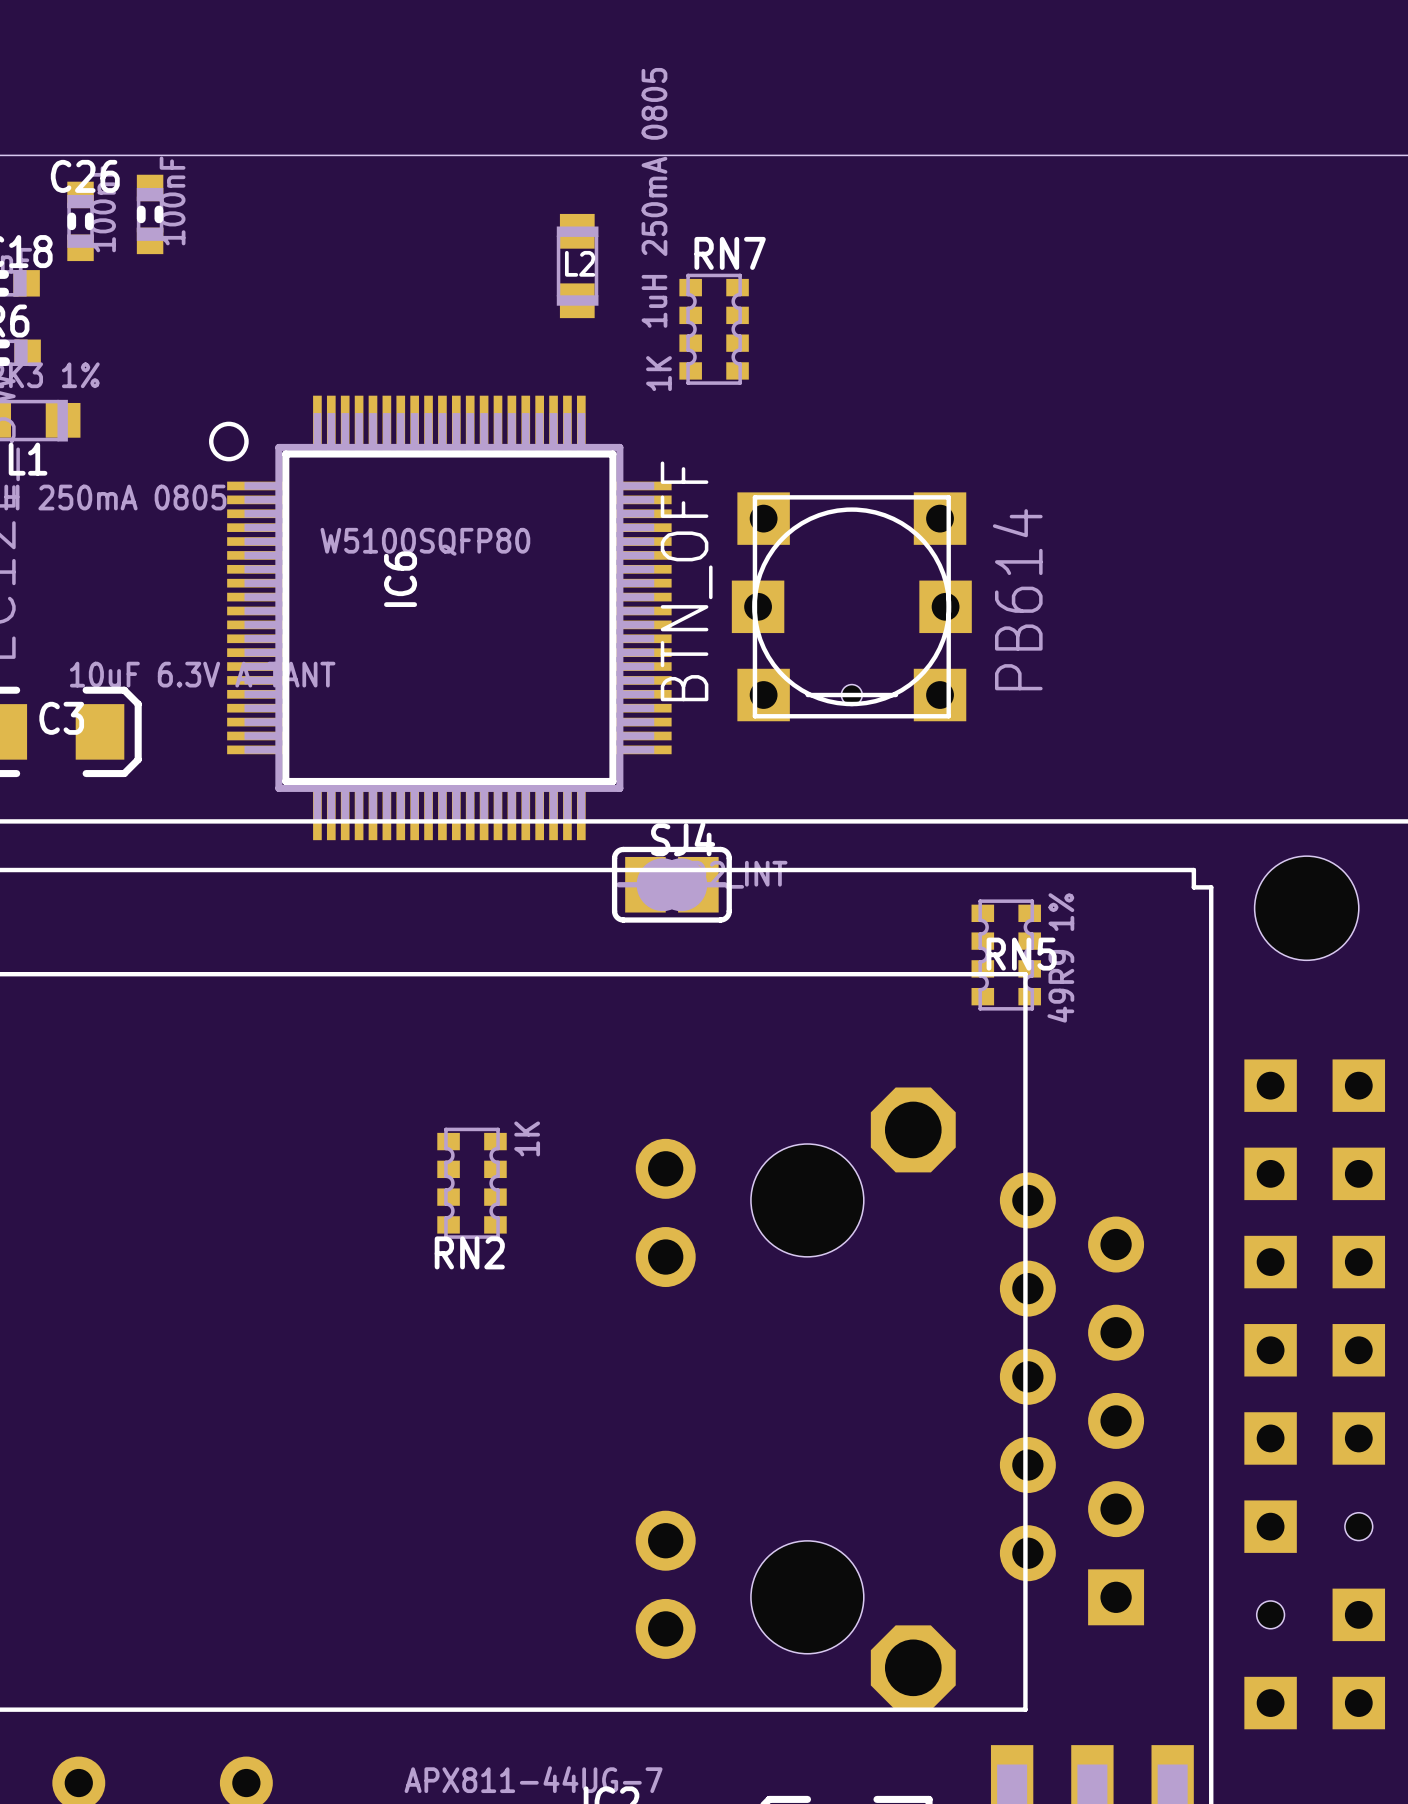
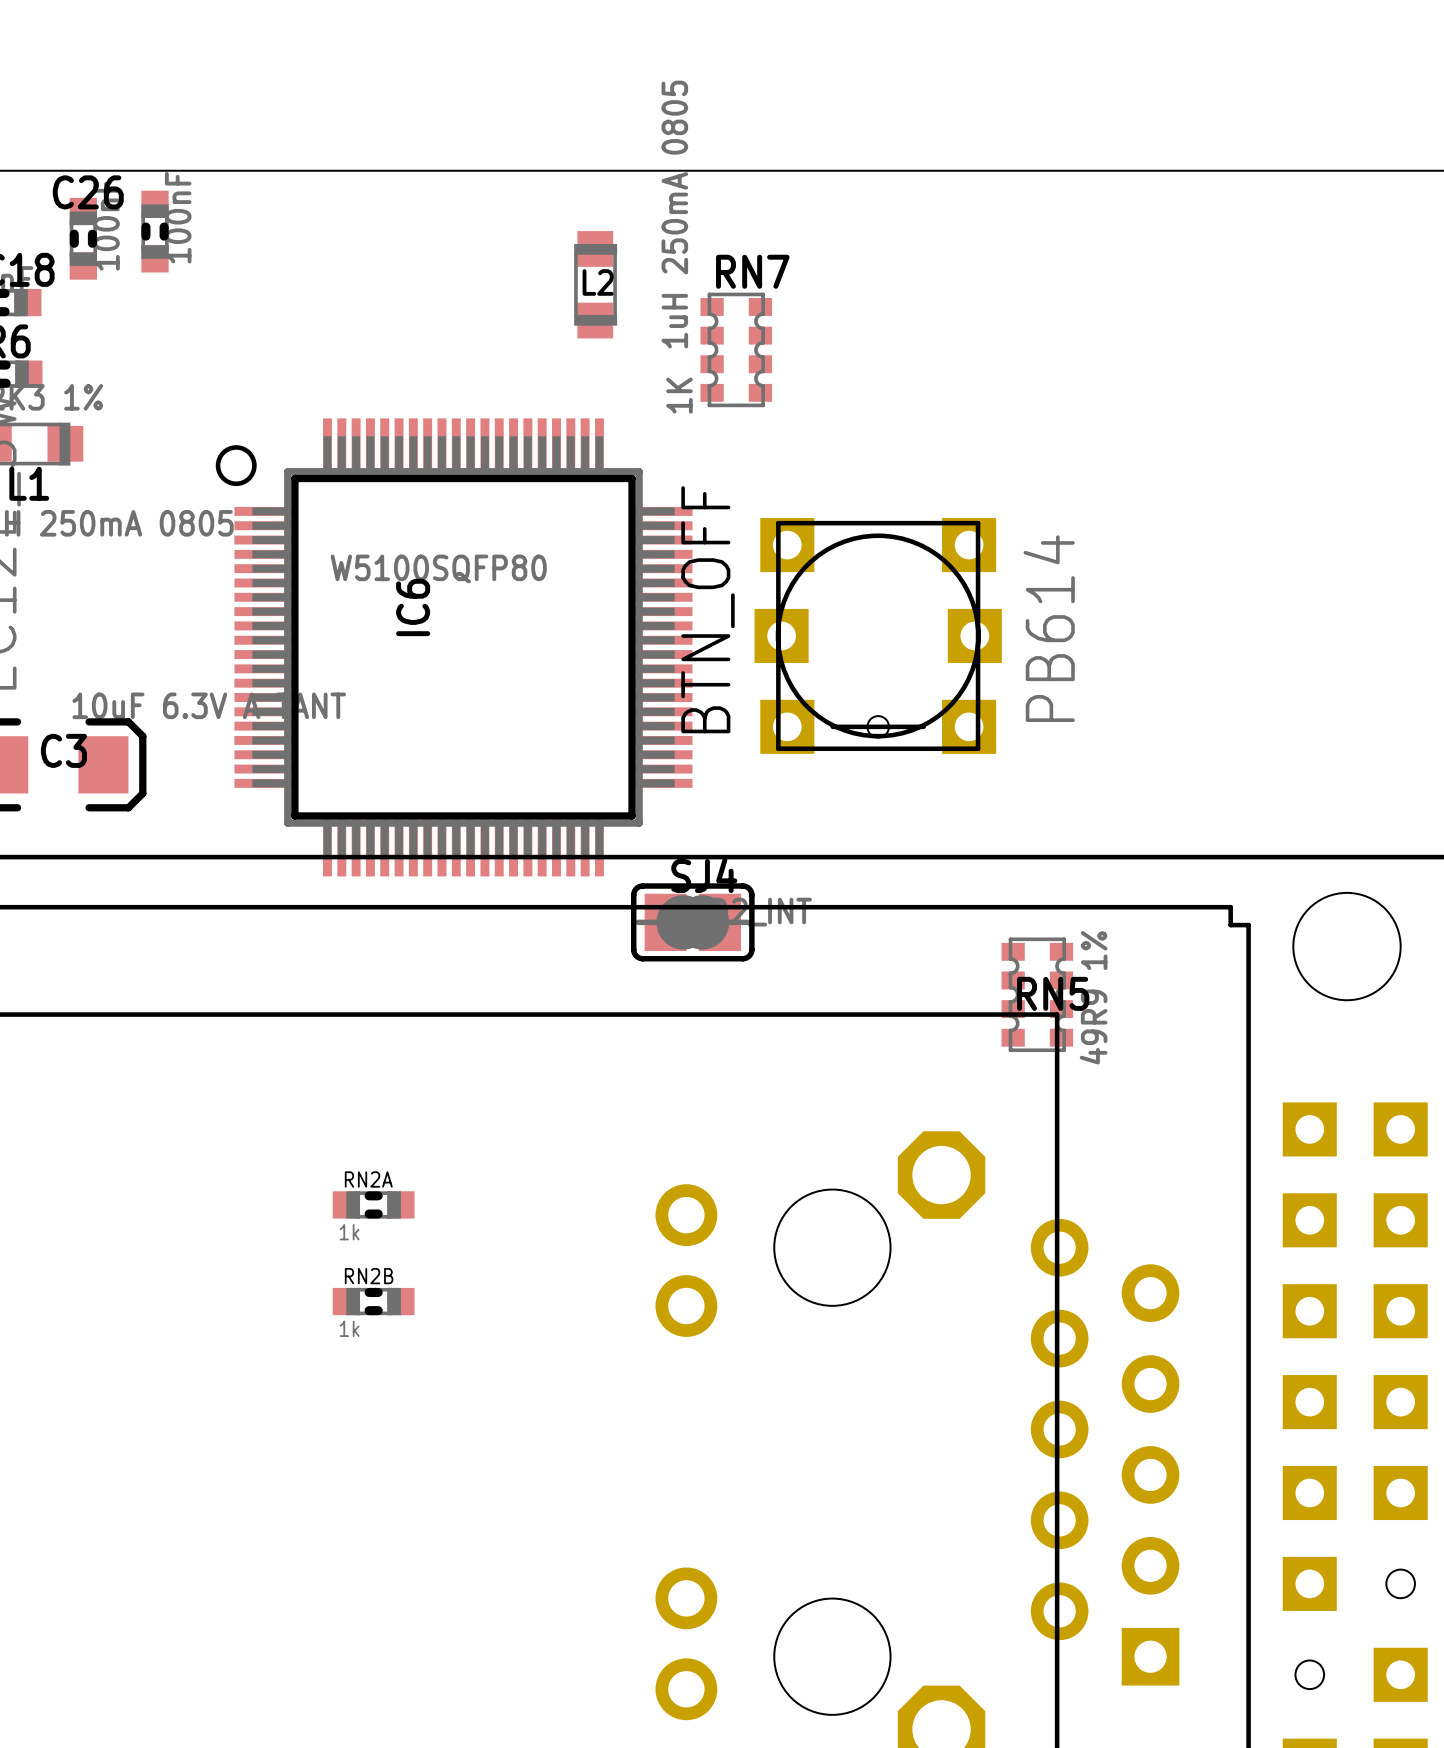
RN2A: none -> 1k (373, 1204)
RN2: 1K (472, 1183) -> none
RN2B: none -> 1k (373, 1301)

